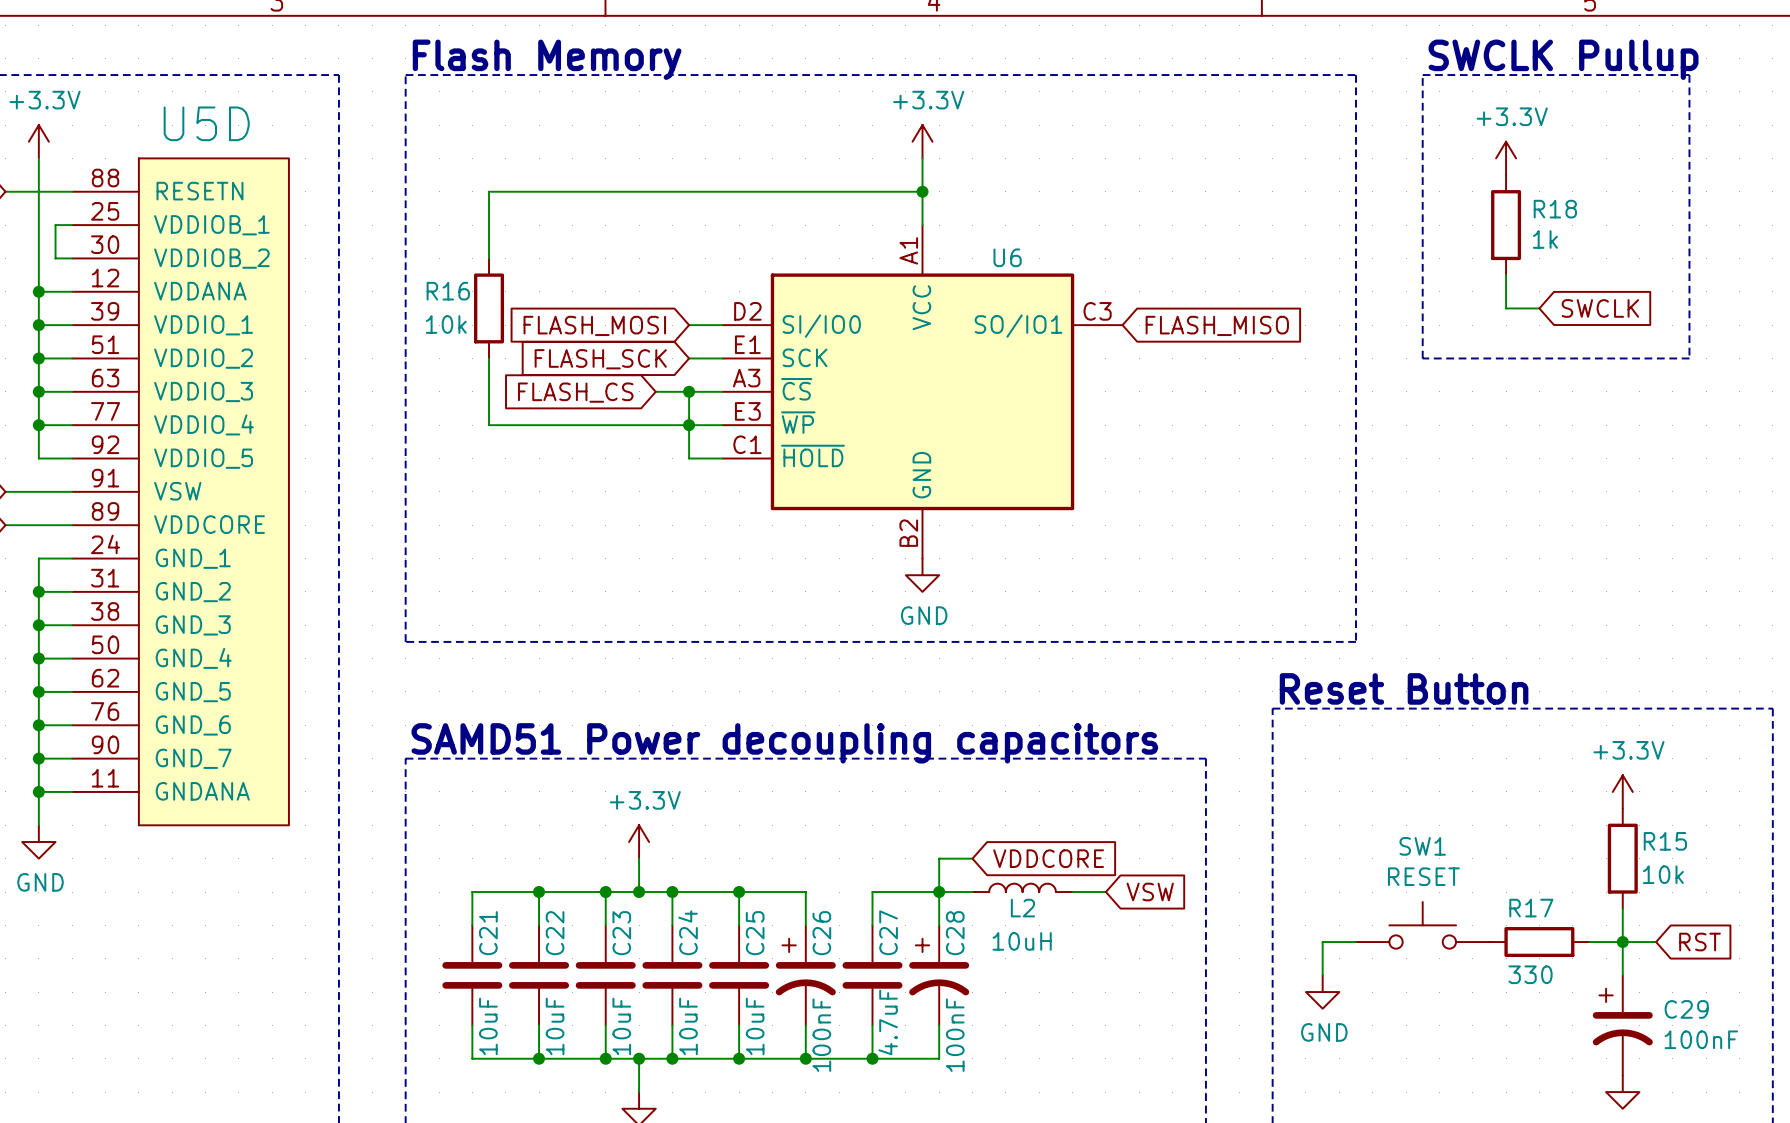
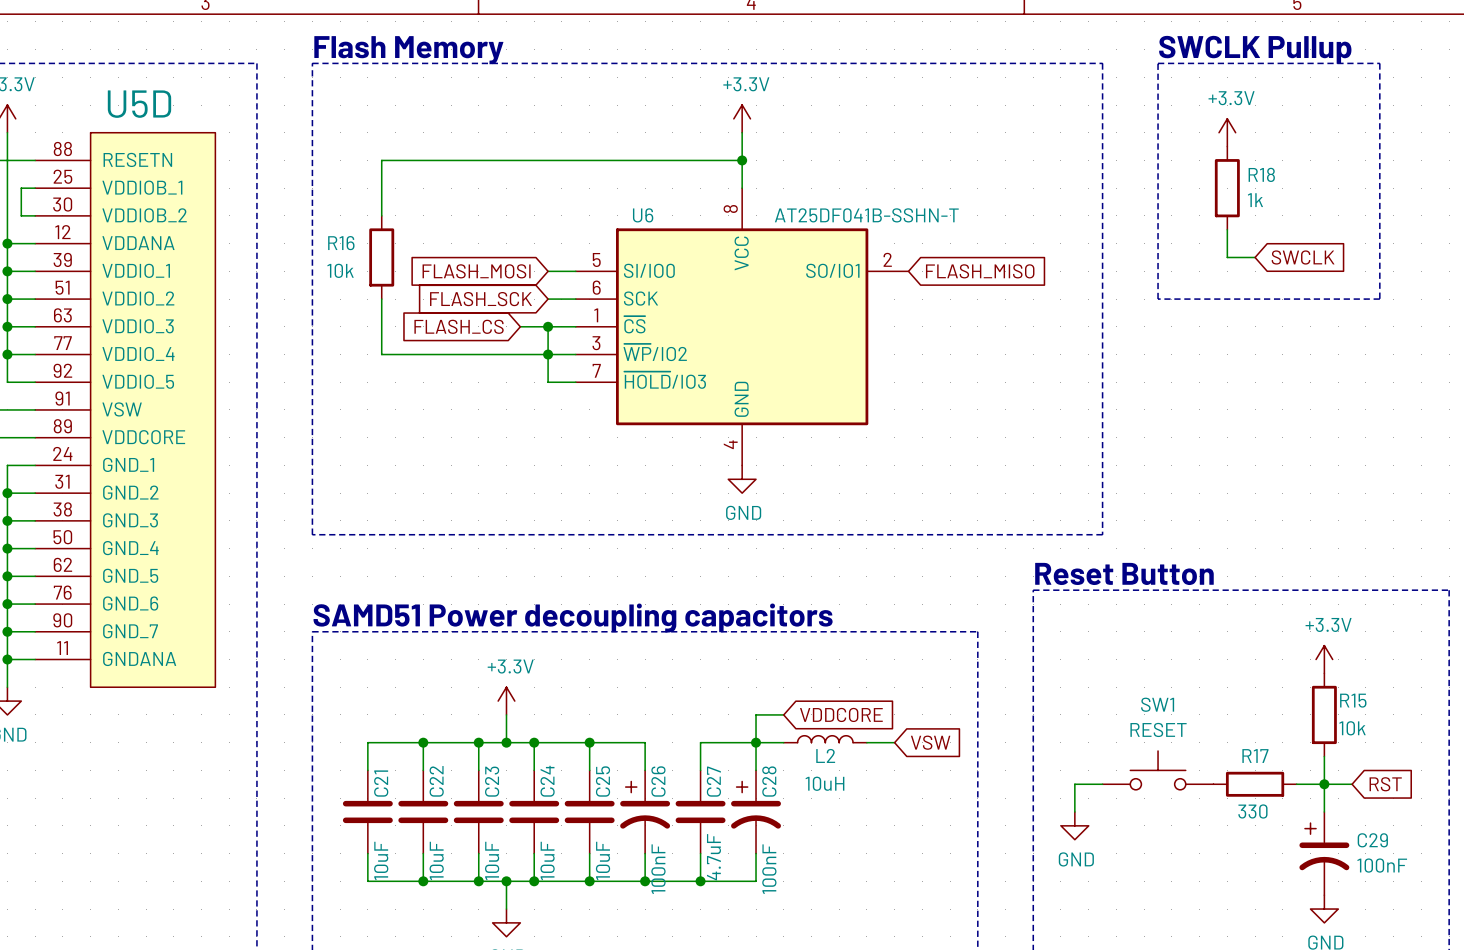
U6 symbol: [722, 225, 1123, 559] -> [575, 188, 909, 466]
U6 name position: U6 (1007, 257) -> U6 (643, 215)
U6 text: none -> AT25DF041B-SSHN-T (866, 215)

